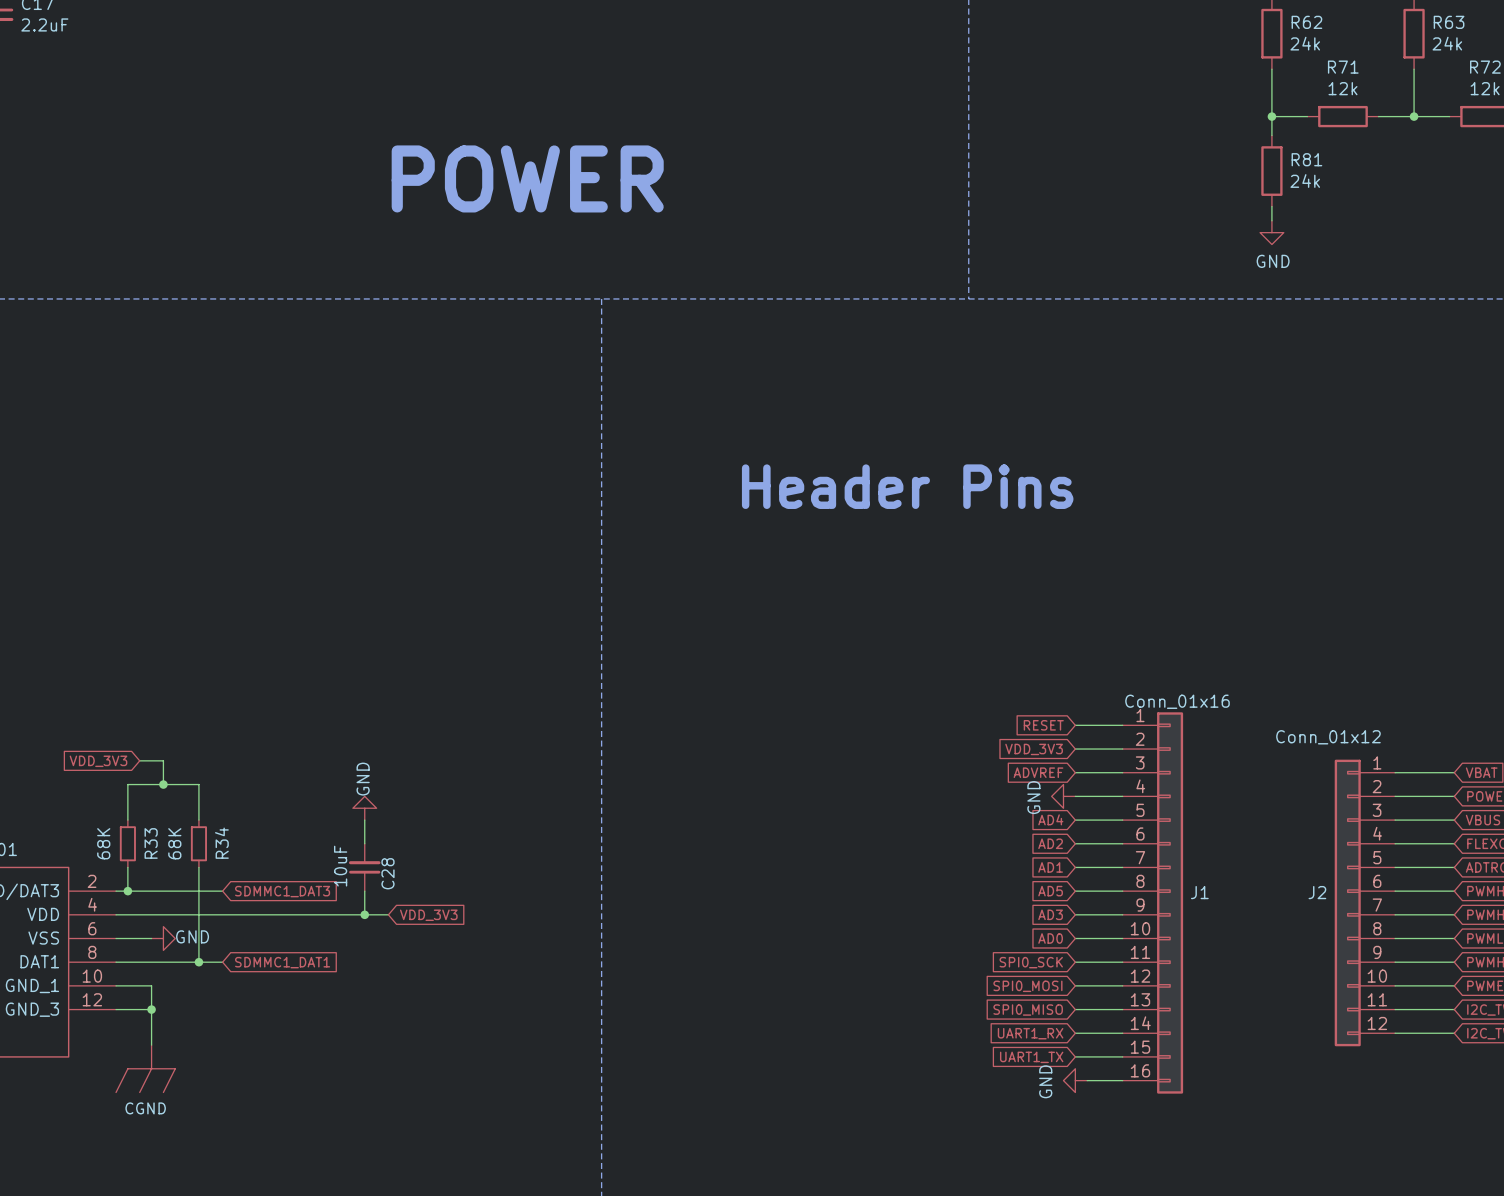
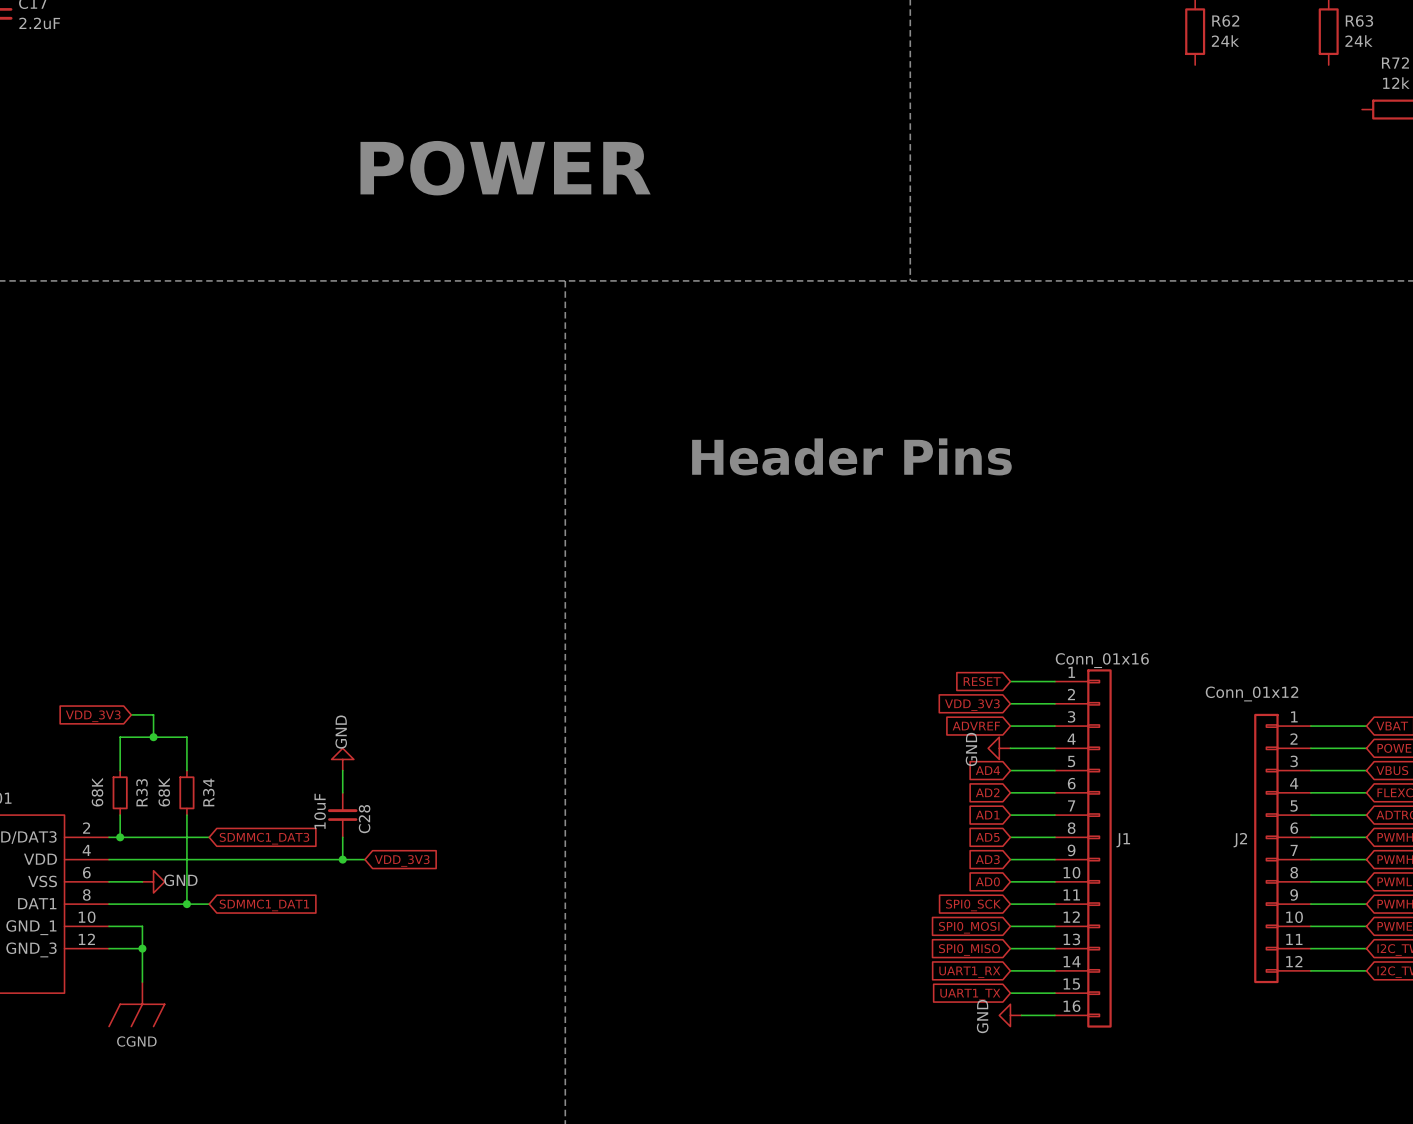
wire: (1271, 69) (1271, 135) -> none
wire: (1414, 69) (1414, 116) -> none
wire: (1271, 116) (1307, 116) -> none
junction: (1271, 116) -> none
R71: 12k (1342, 116) -> none
wire: (1378, 116) (1449, 116) -> none
junction: (1414, 116) -> none
R81: 24k (1271, 171) -> none
wire: (1271, 206) (1271, 220) -> none
power symbol: GND (1271, 232) -> none

